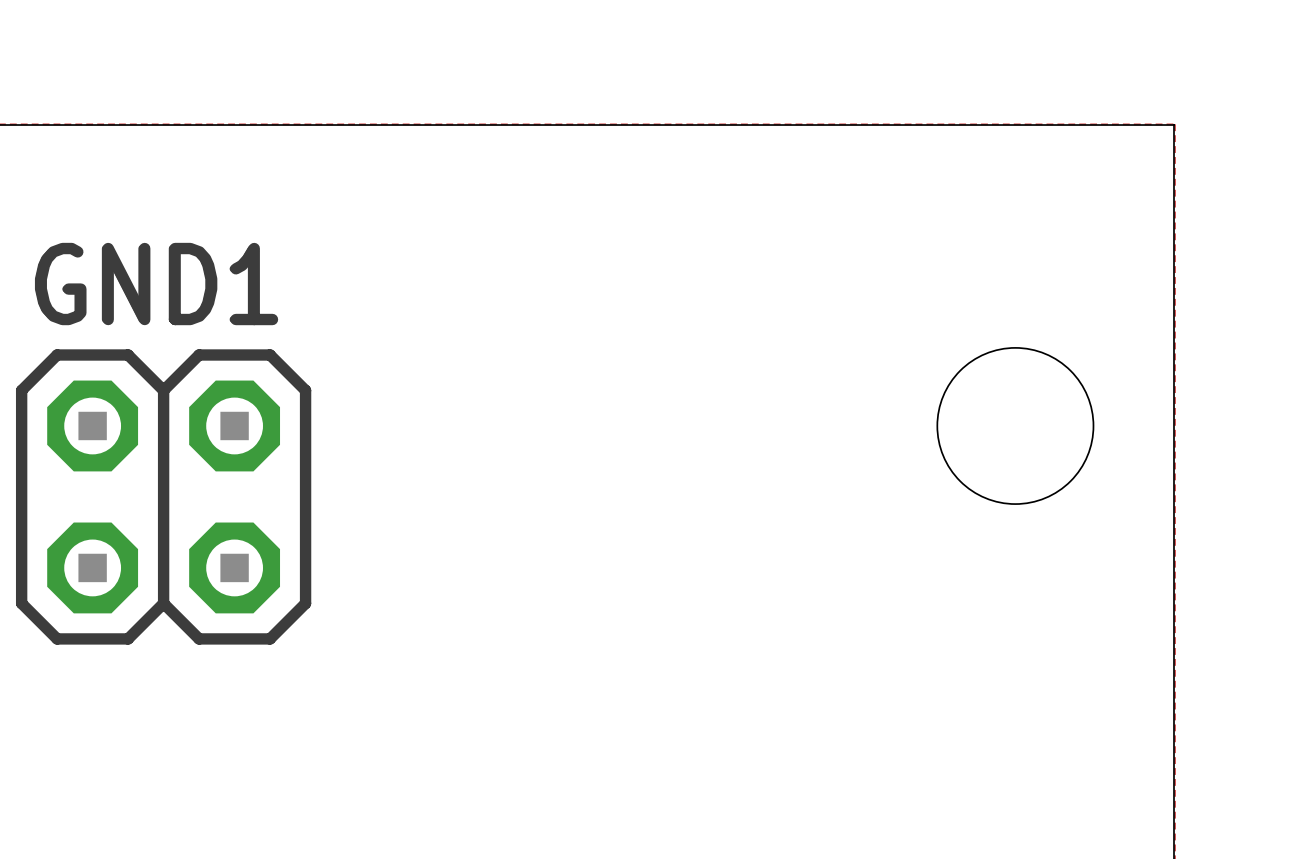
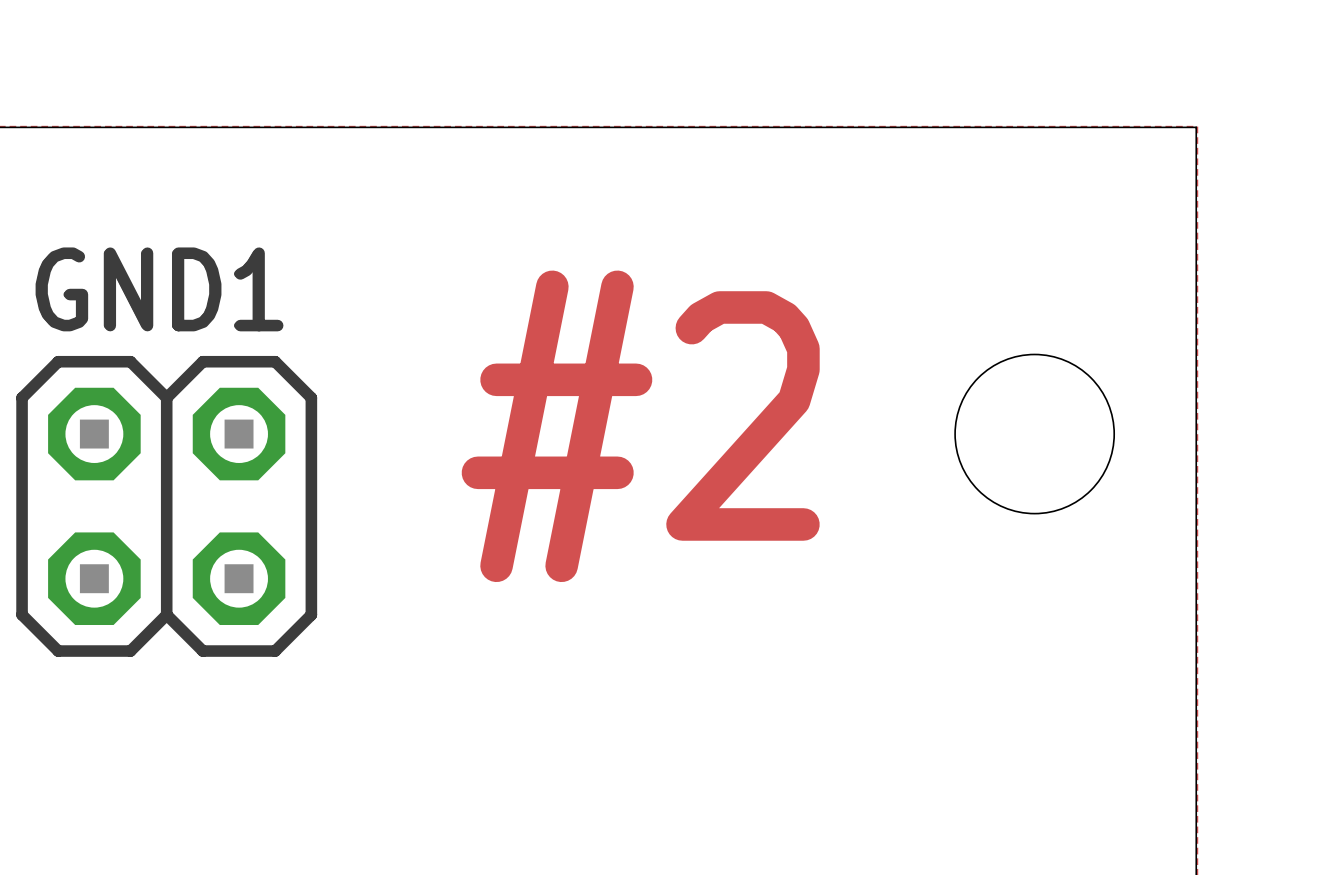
text: none -> #2 (640, 426)

